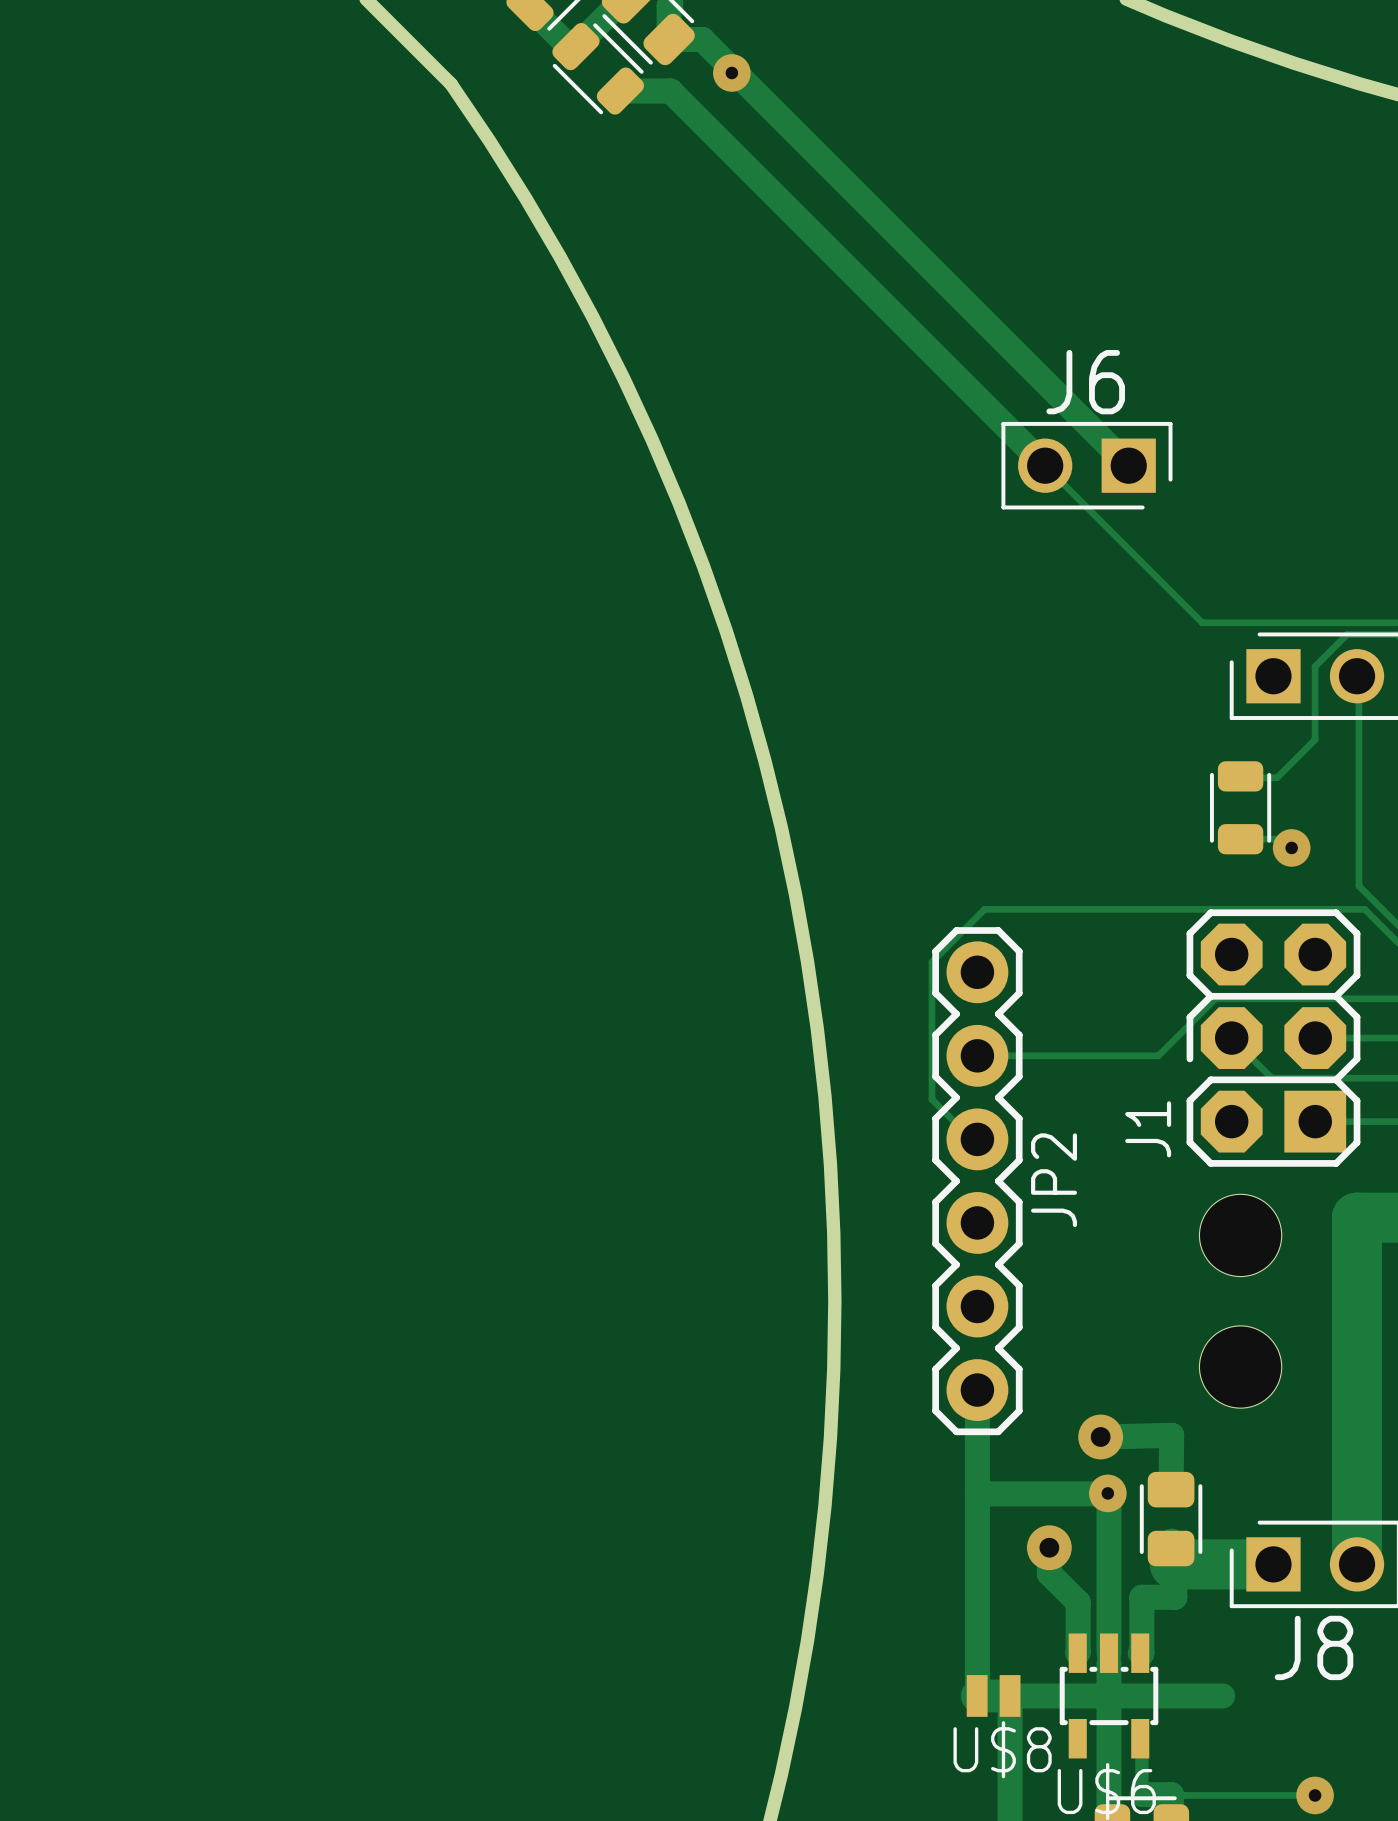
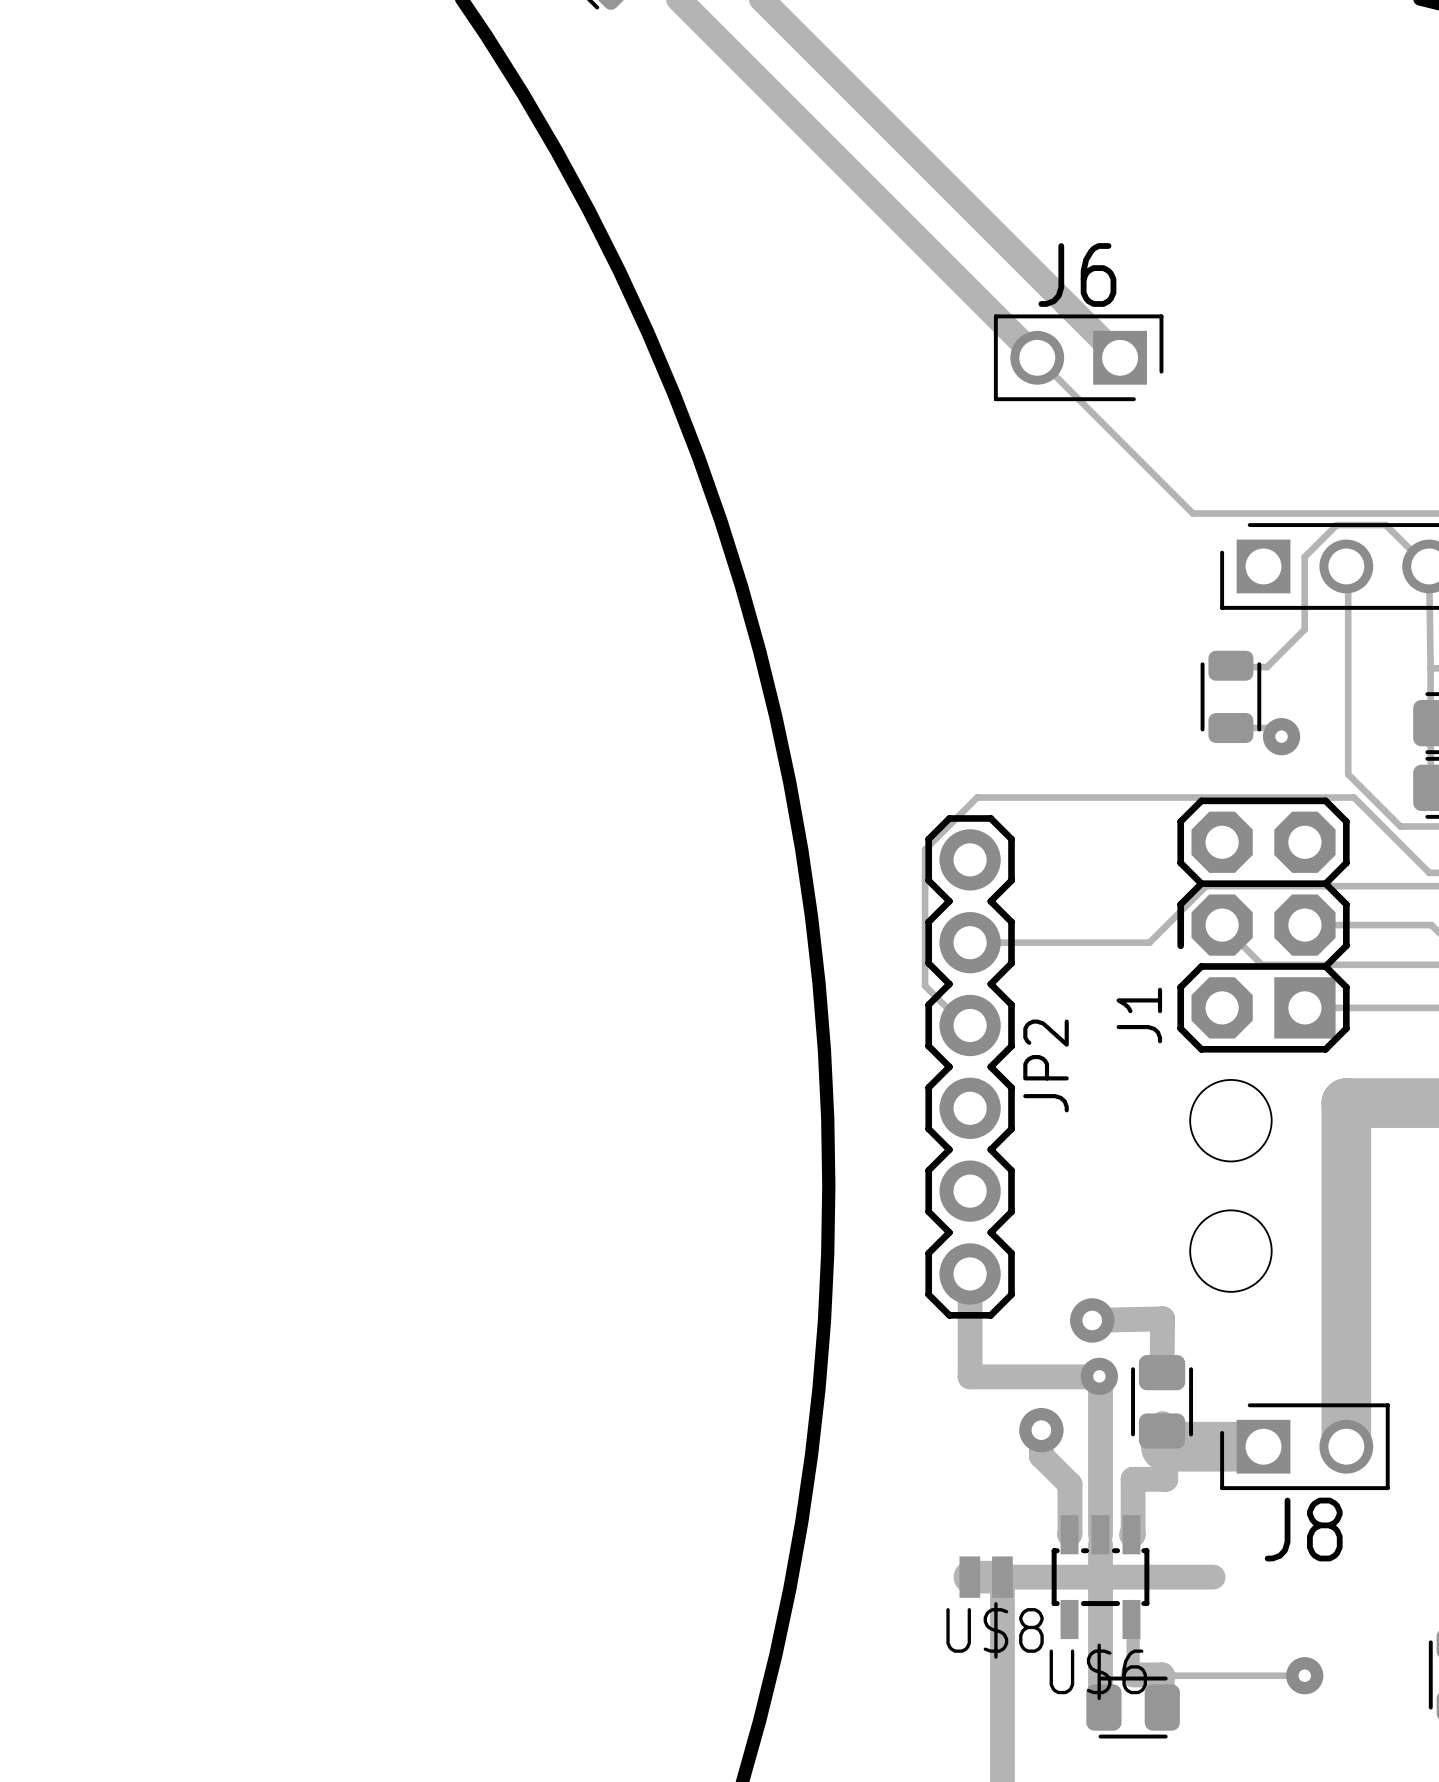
track: (977, 1493) (977, 1695) -> none

